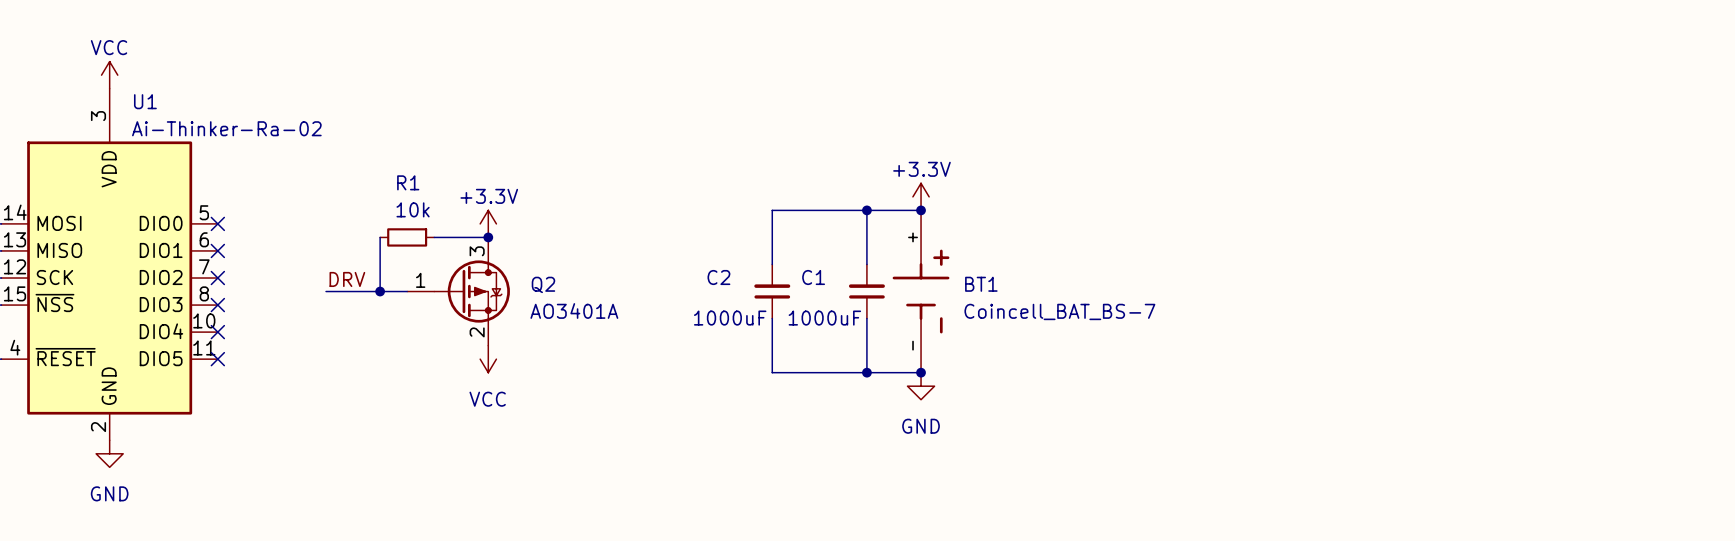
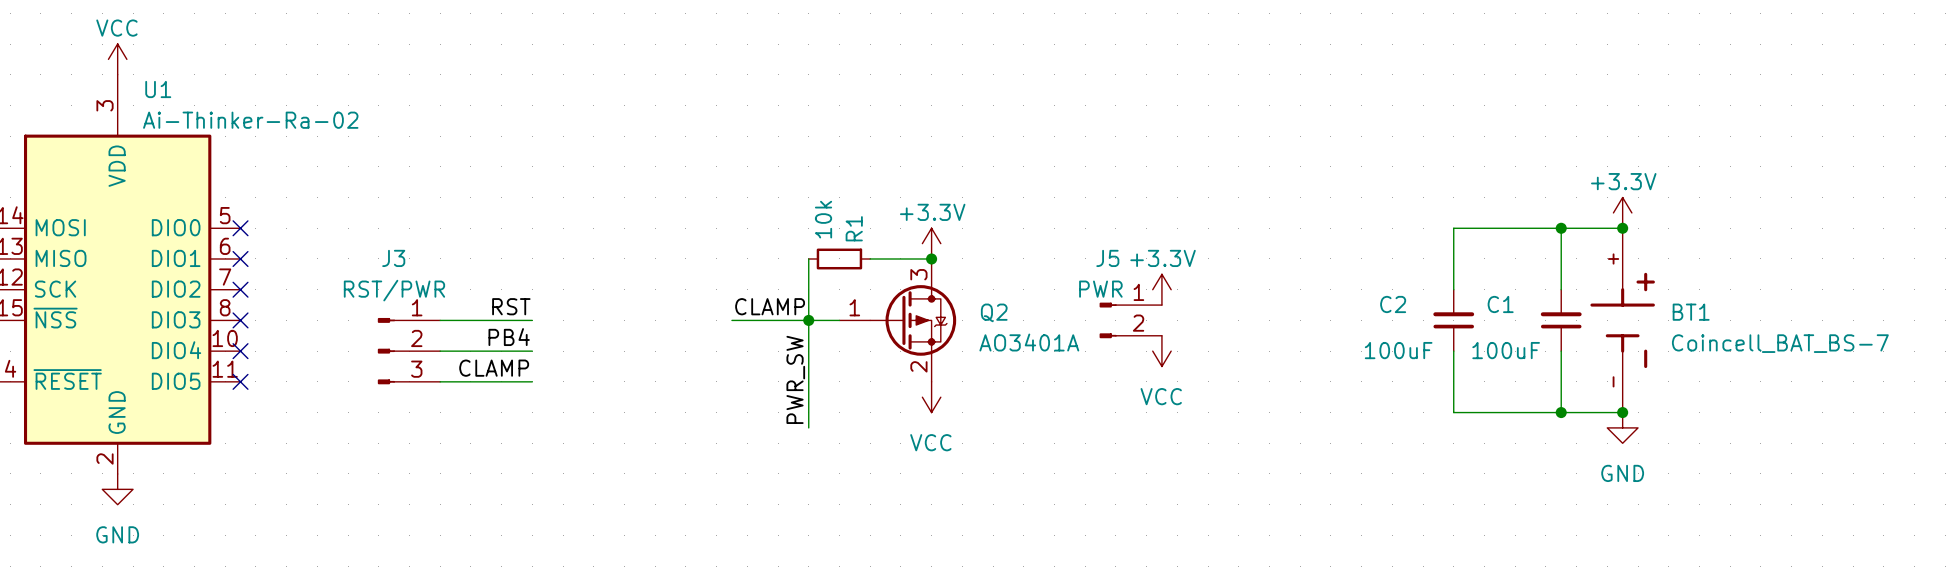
R1 name rotation: 0° (408, 182) -> 90° counterclockwise (854, 228)
power symbol: +3.3V (921, 196) -> none
R1 value rotation: 0° (413, 209) -> 90° counterclockwise (823, 219)
wire: (866, 210) (866, 264) -> none
junction: (866, 210) -> none
wire: (921, 210) (772, 210) (772, 264) -> none
junction: (921, 210) -> none
power symbol: none -> +3.3V (1622, 212)
power symbol: +3.3V (488, 223) -> none
wire: none -> (1561, 228) (1561, 289)
junction: none -> (1561, 228)
wire: none -> (1622, 228) (1453, 228) (1453, 289)
junction: none -> (1622, 228)
wire: (380, 237) (380, 291) -> none
R1 position: (407, 237) -> (839, 258)
wire: (434, 237) (488, 237) -> none
junction: (488, 237) -> none
power symbol: none -> +3.3V (931, 243)
wire: none -> (808, 258) (808, 427)
wire: none -> (870, 258) (931, 258)
junction: none -> (931, 258)
power symbol: none -> +3.3V (1161, 289)
label: DRV (347, 279) -> none
wire: (326, 291) (407, 291) -> (440, 320) (532, 320)
junction: (380, 291) -> none
Q2 position: (458, 291) -> (897, 320)
C2 position: (772, 291) -> (1453, 320)
C1 position: (866, 291) -> (1561, 320)
BT1 position: (921, 291) -> (1622, 320)
label: none -> RST (511, 306)
label: none -> CLAMP (770, 306)
wire: none -> (731, 320) (839, 320)
junction: none -> (808, 320)
J5: none -> PWR (1130, 320)
C2 value: 1000uF (730, 318) -> 100uF (1398, 350)
wire: (772, 318) (772, 372) (921, 372) -> none
C1 value: 1000uF (824, 318) -> 100uF (1506, 350)
wire: (866, 318) (866, 372) -> none
label: none -> PB4 (509, 337)
J3: none -> RST/PWR (408, 351)
wire: none -> (440, 351) (532, 351)
power symbol: none -> VCC (1161, 351)
wire: none -> (1453, 351) (1453, 412) (1622, 412)
wire: none -> (1561, 351) (1561, 412)
label: none -> CLAMP (494, 368)
label: none -> PWR_SW (795, 379)
wire: none -> (440, 381) (532, 381)
power symbol: VCC (488, 359) -> none
power symbol: none -> VCC (931, 397)
junction: (866, 372) -> none
junction: (921, 372) -> none
power symbol: GND (921, 386) -> none
junction: none -> (1561, 412)
junction: none -> (1622, 412)
power symbol: none -> GND (1622, 427)

